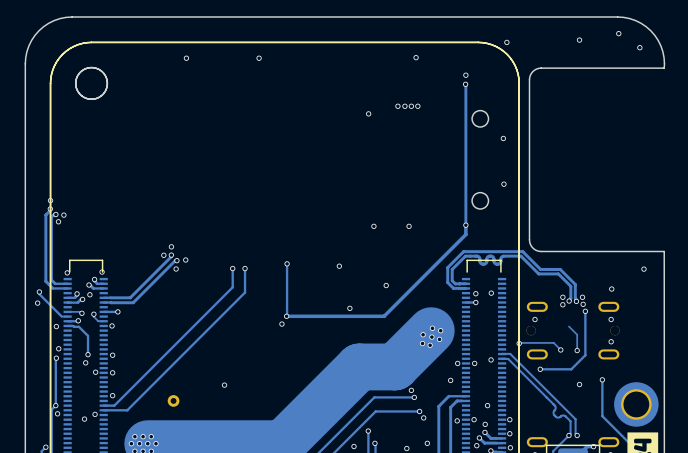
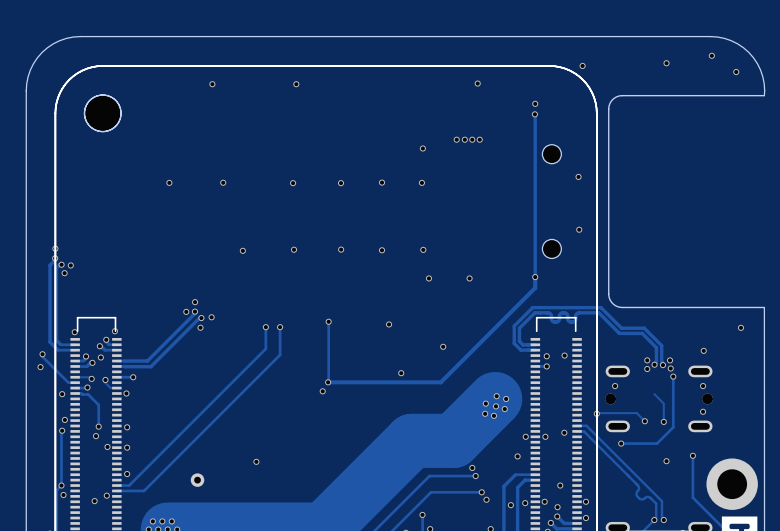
via: none -> (169, 182)
via: none -> (223, 182)
via: none -> (293, 183)
via: none -> (340, 183)
via: none -> (382, 182)
via: none -> (421, 182)
via: none -> (294, 249)
via: none -> (341, 249)
via: none -> (382, 250)
via: none -> (423, 249)
via: none -> (242, 250)
via: none -> (510, 505)

